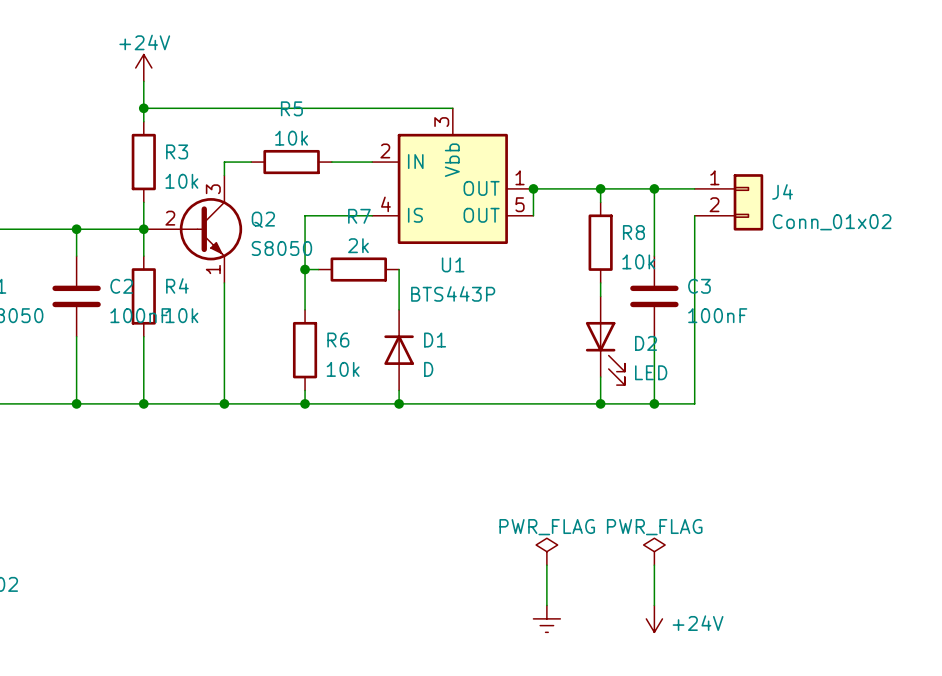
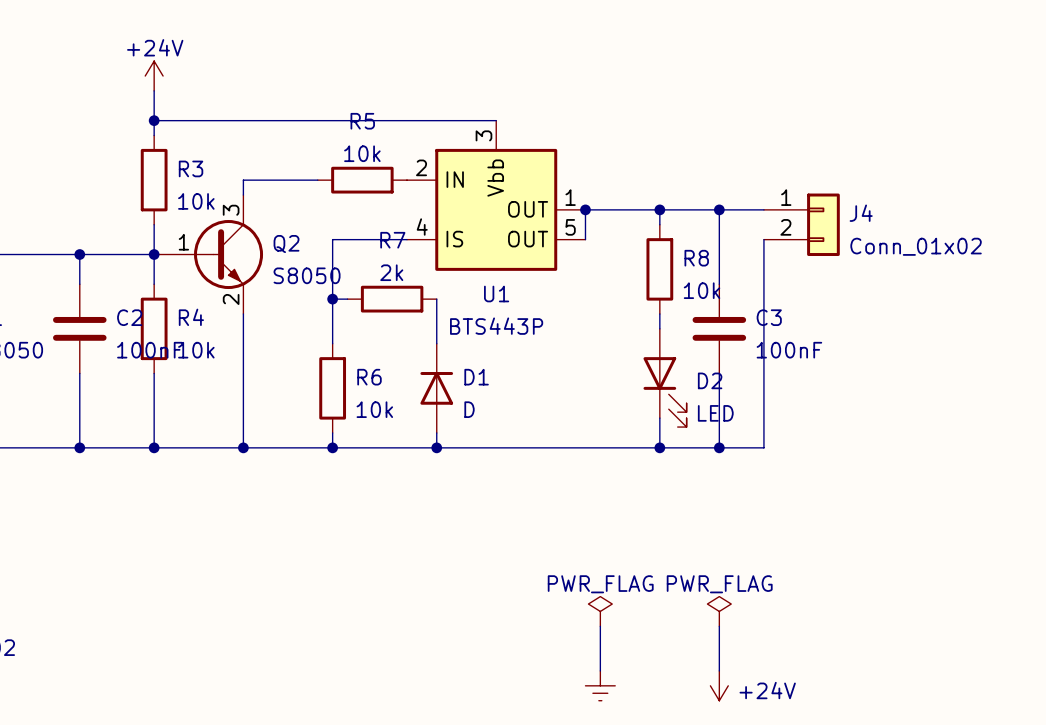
R5 position: (291, 162) -> (362, 180)
wire: (331, 162) (372, 162) -> (273, 180) (317, 180)
Q2 pin number: 2 (170, 218) -> 1 (183, 242)
Q2 pin number: 1 (213, 269) -> 2 (231, 299)

